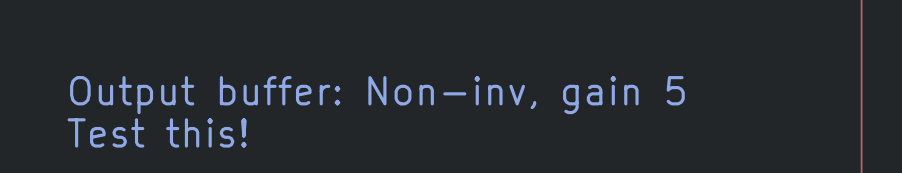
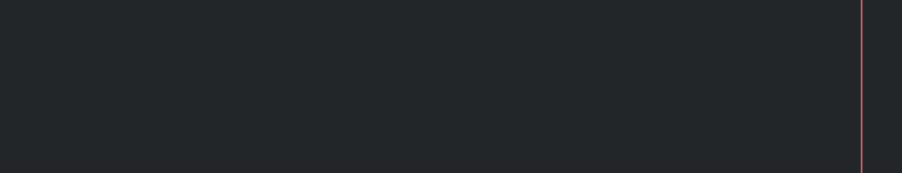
text: Output buffer: Non-inv, gain 5 (377, 95) -> none
text: Test this! (157, 132) -> none

